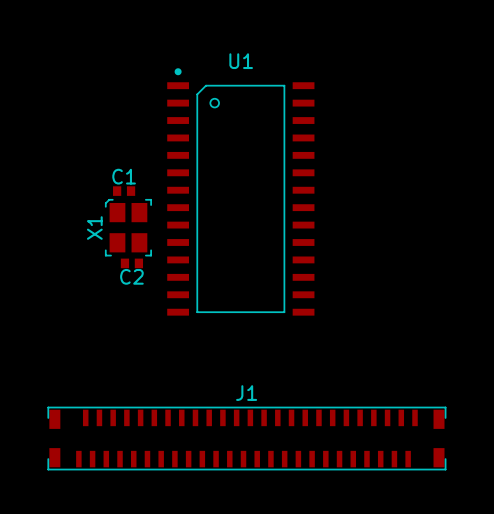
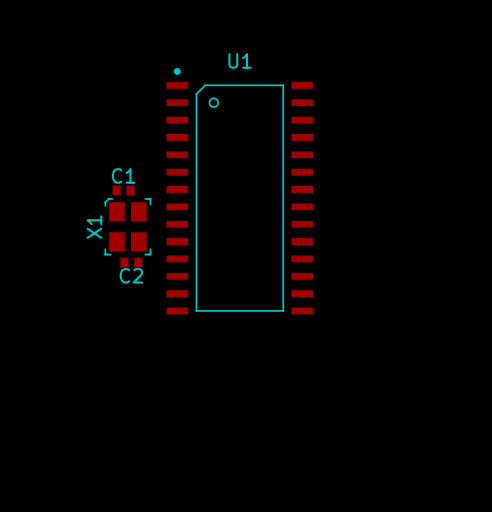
J1: (246, 438) -> none

